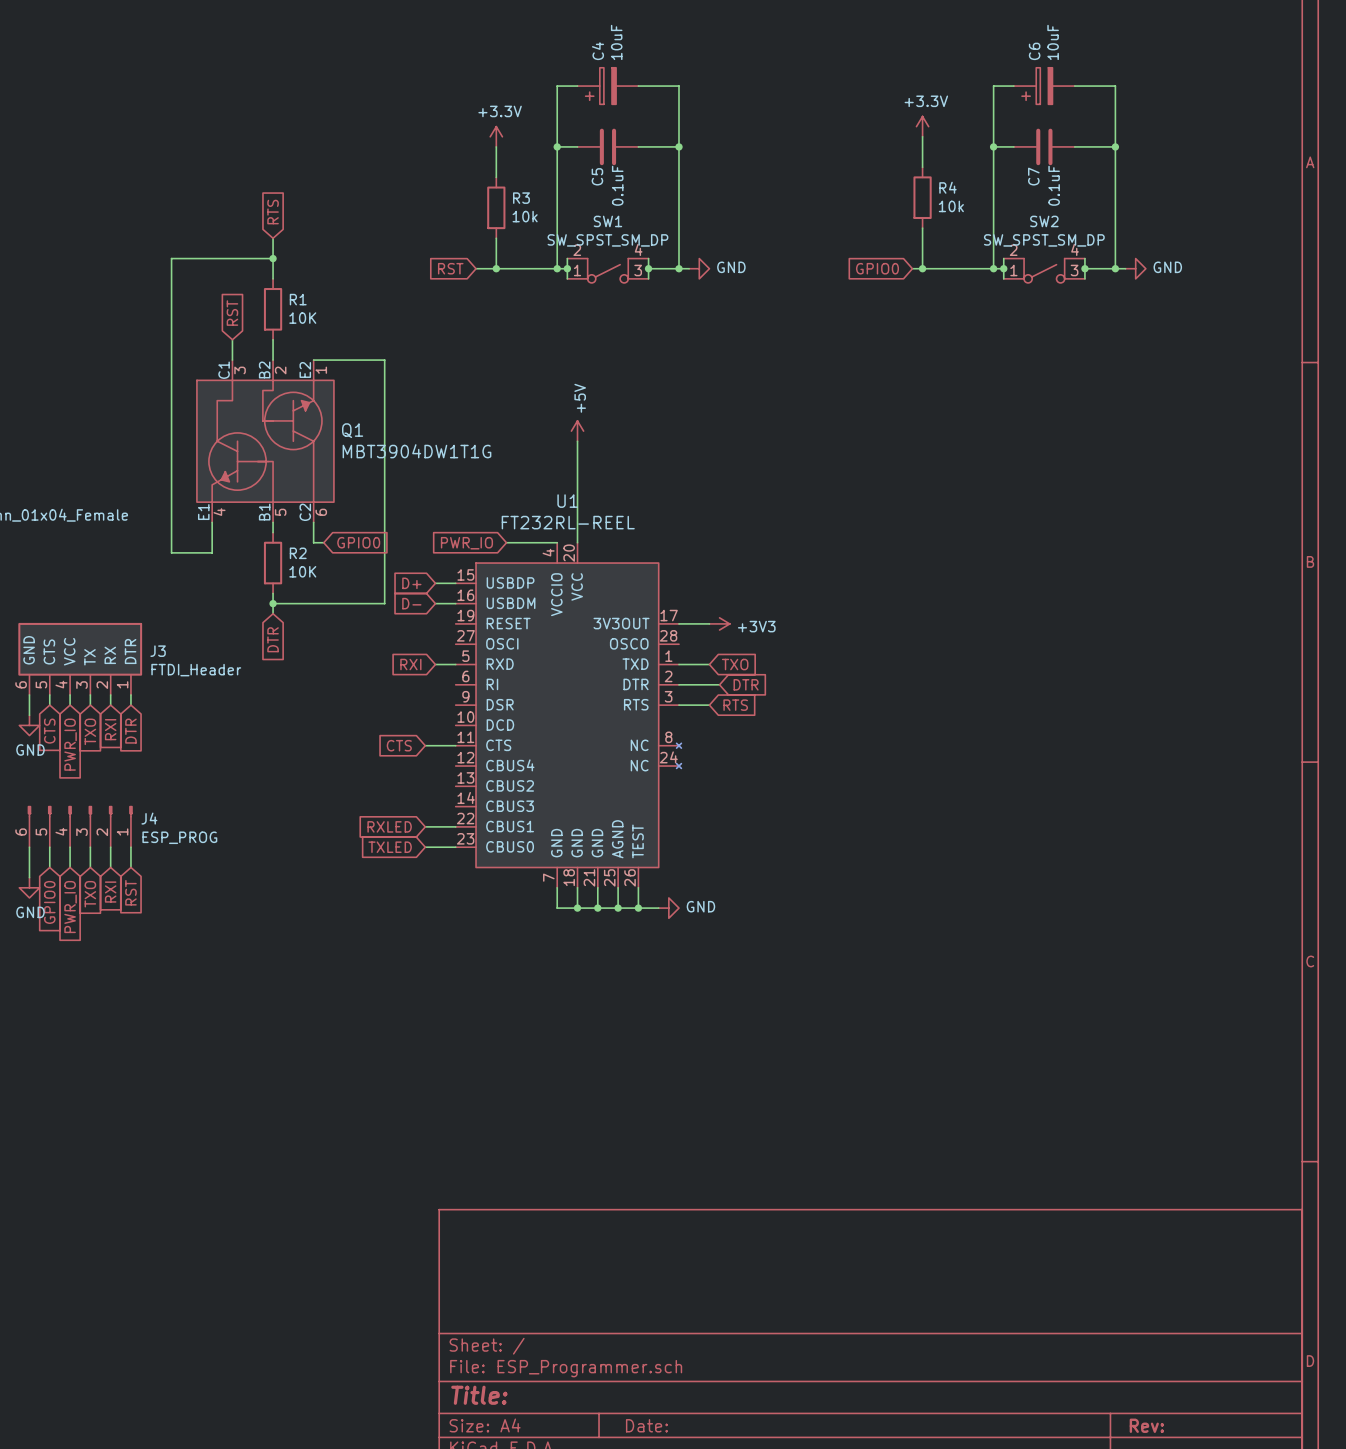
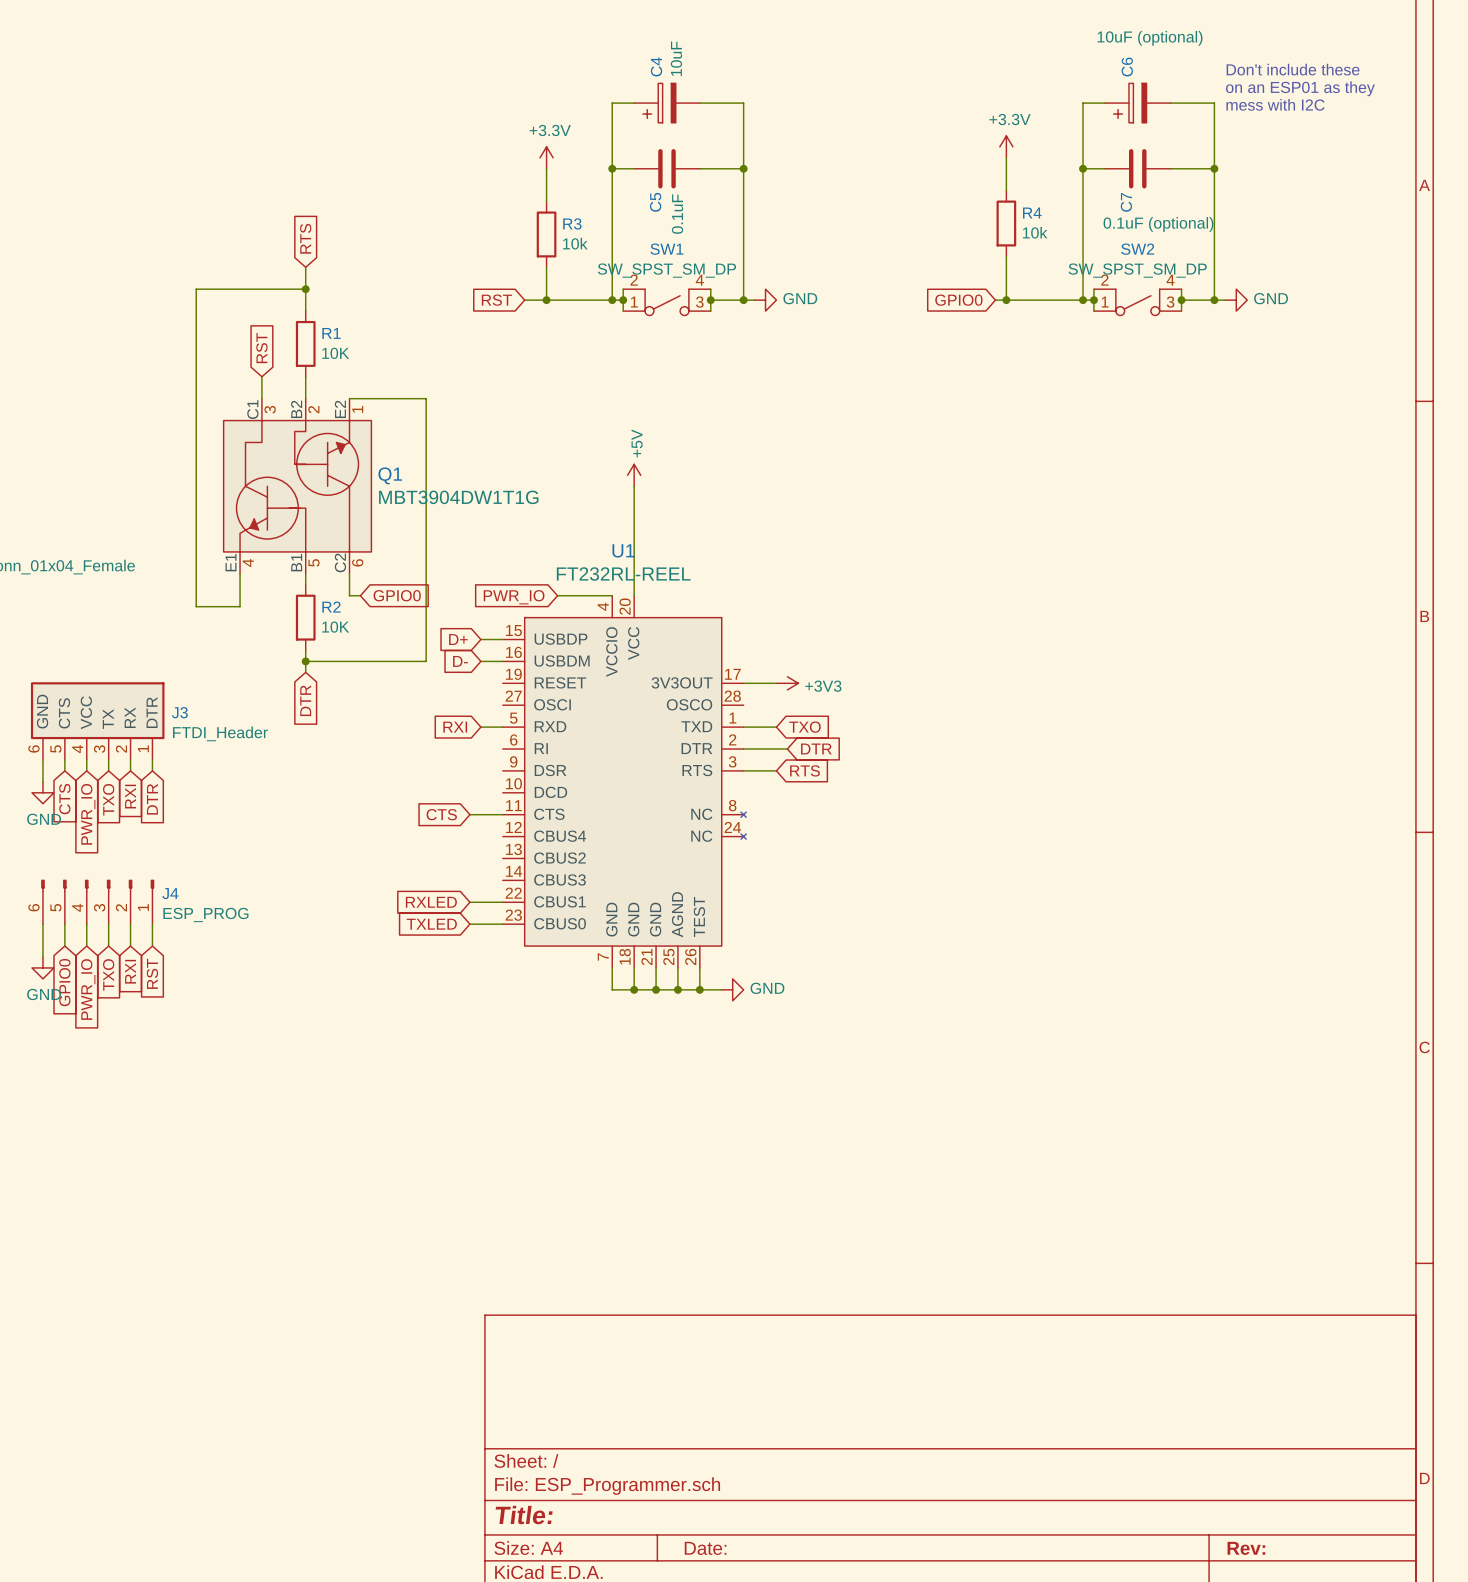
C6 value: 10uF (1053, 42) -> 10uF (optional) (1150, 38)
text: none -> Don't include these (1293, 69)
text: none -> on an ESP01 as they (1300, 88)
text: none -> mess with I2C (1275, 104)
C7 value: 0.1uF (1054, 185) -> 0.1uF (optional) (1158, 224)

